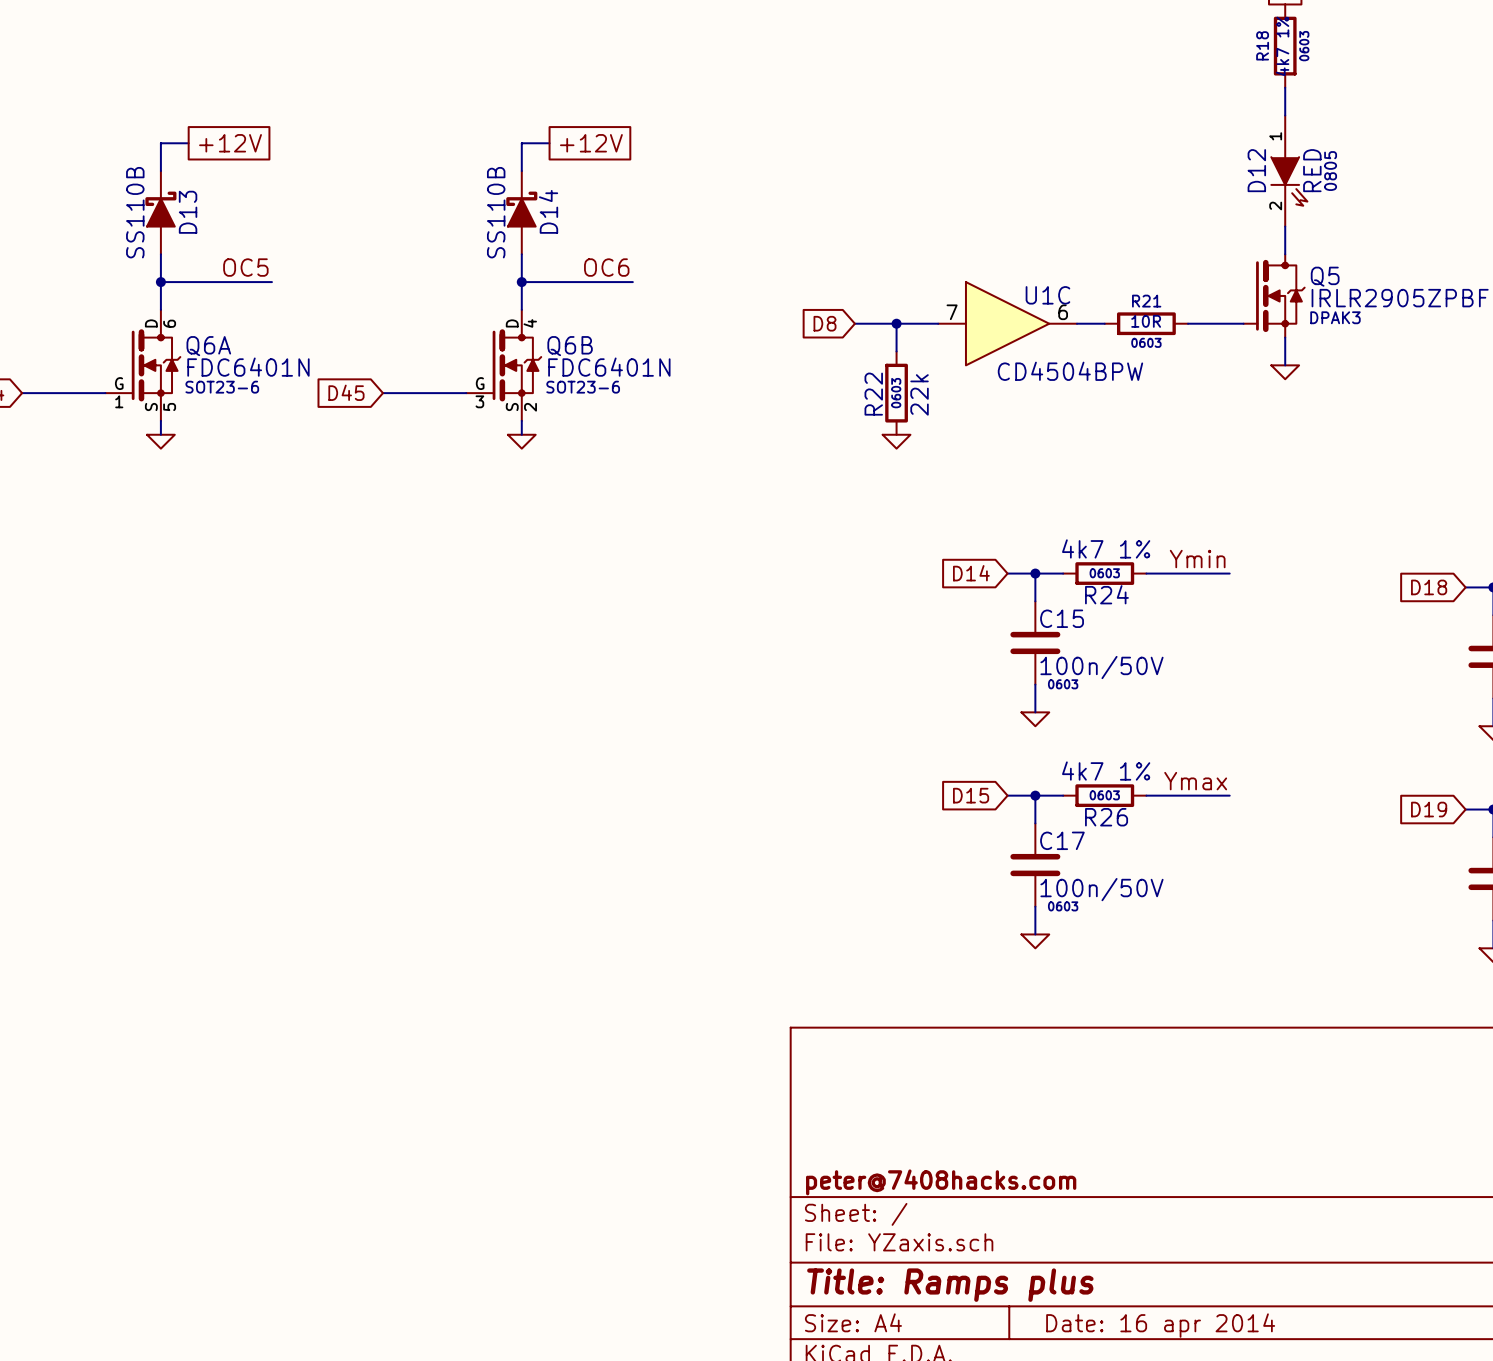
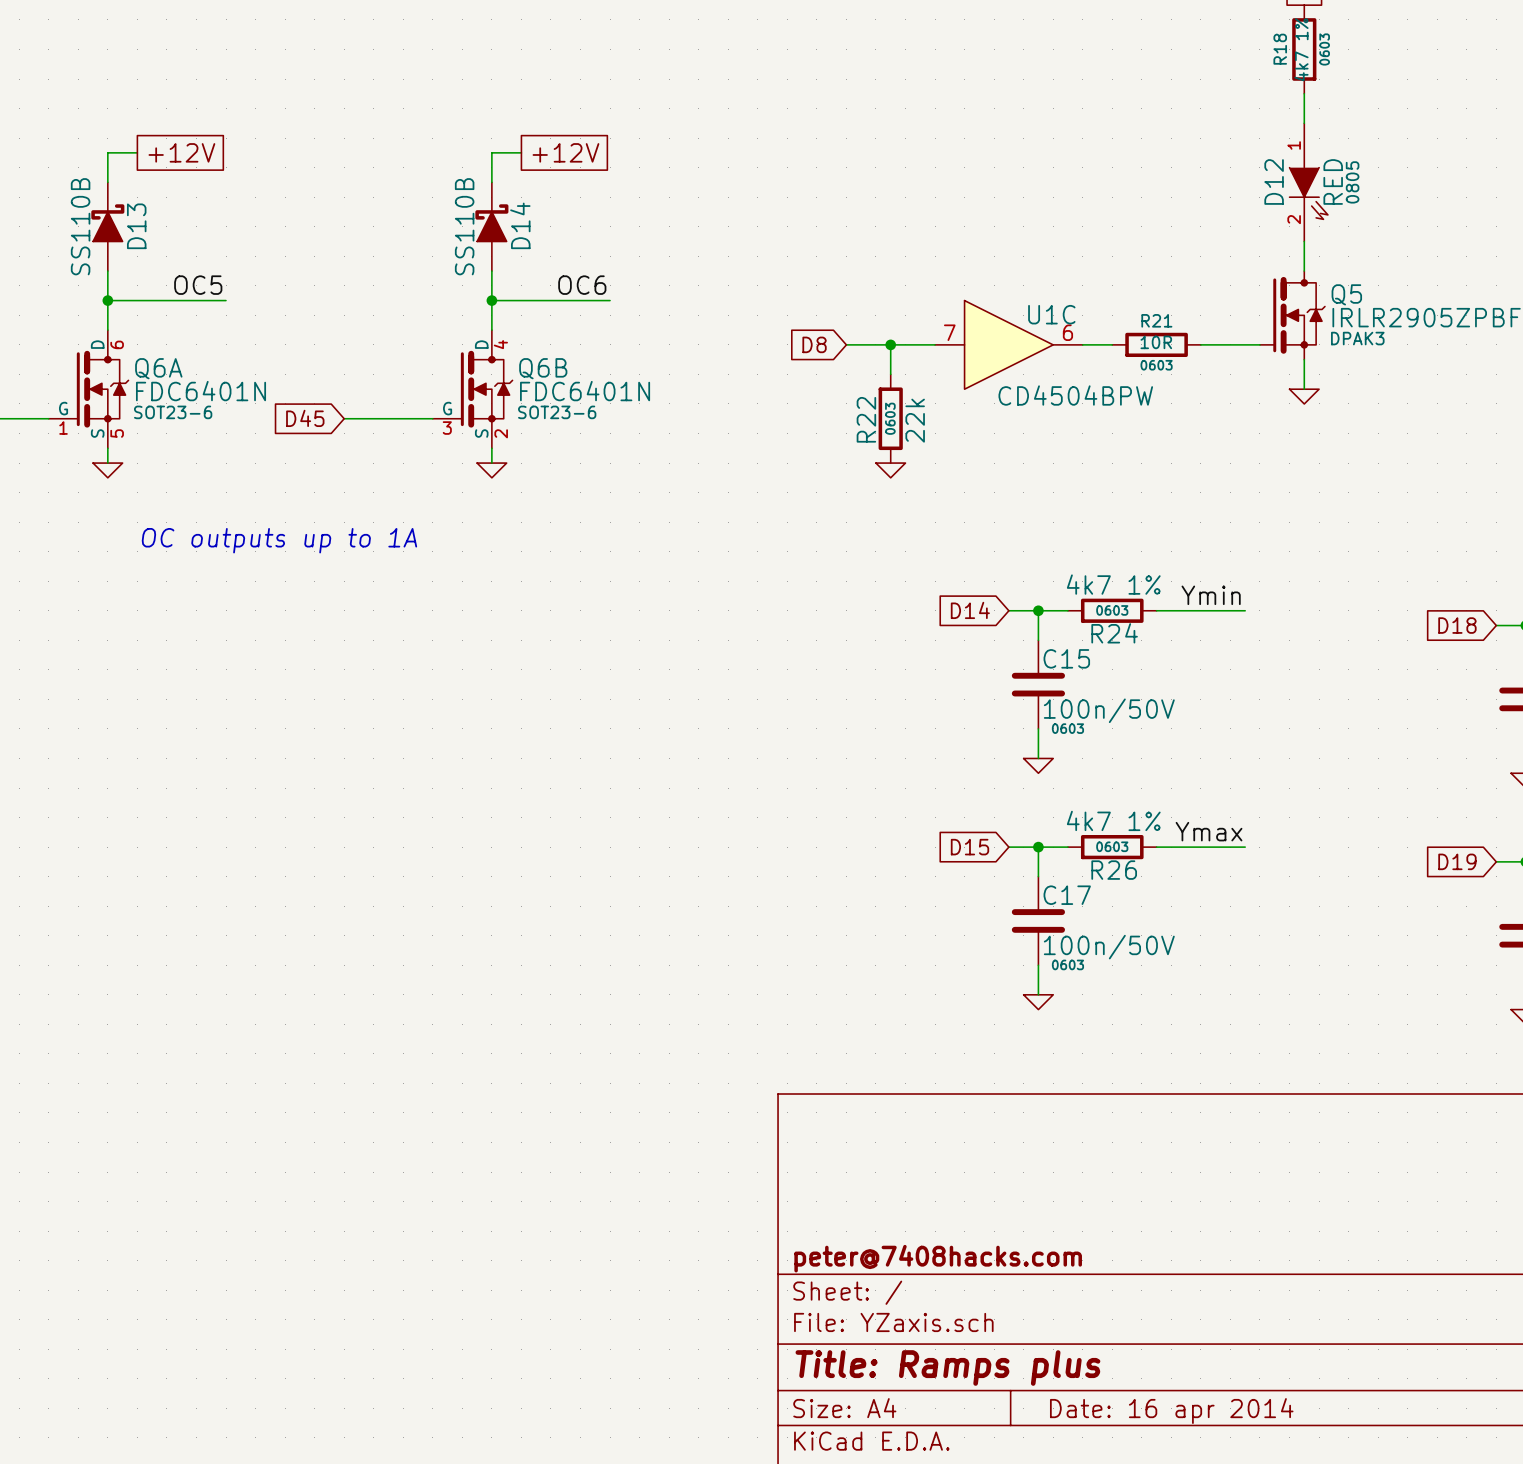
text: none -> OC outputs up to 1A (279, 540)

